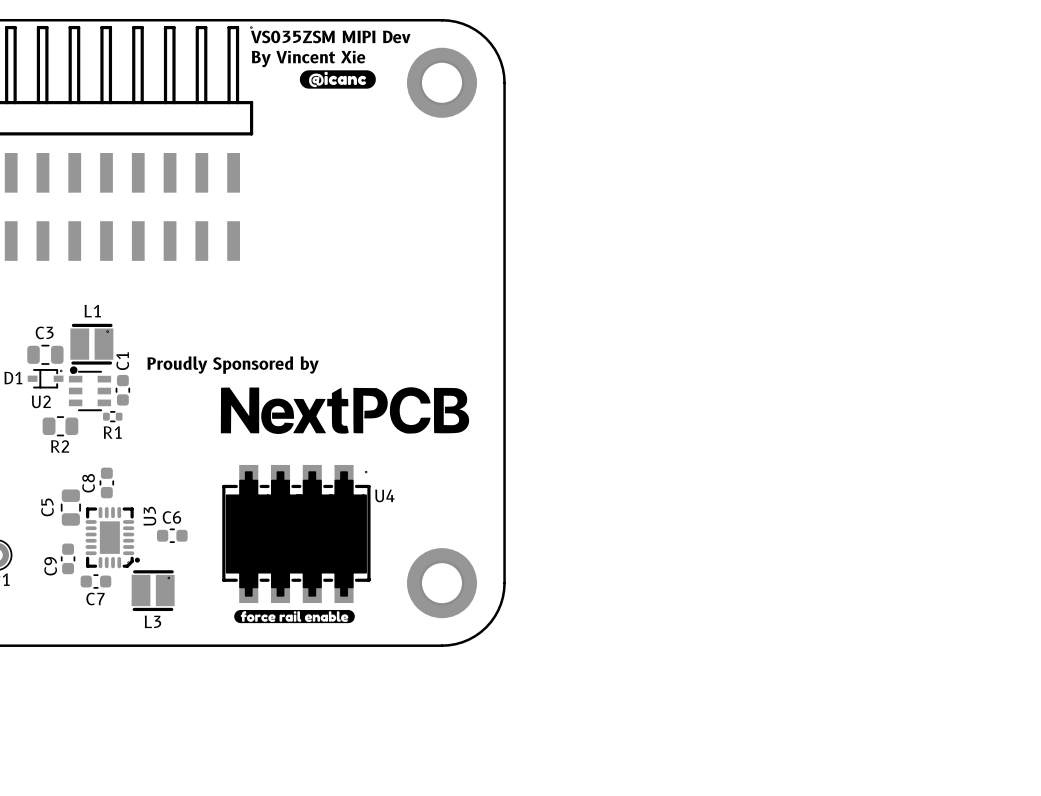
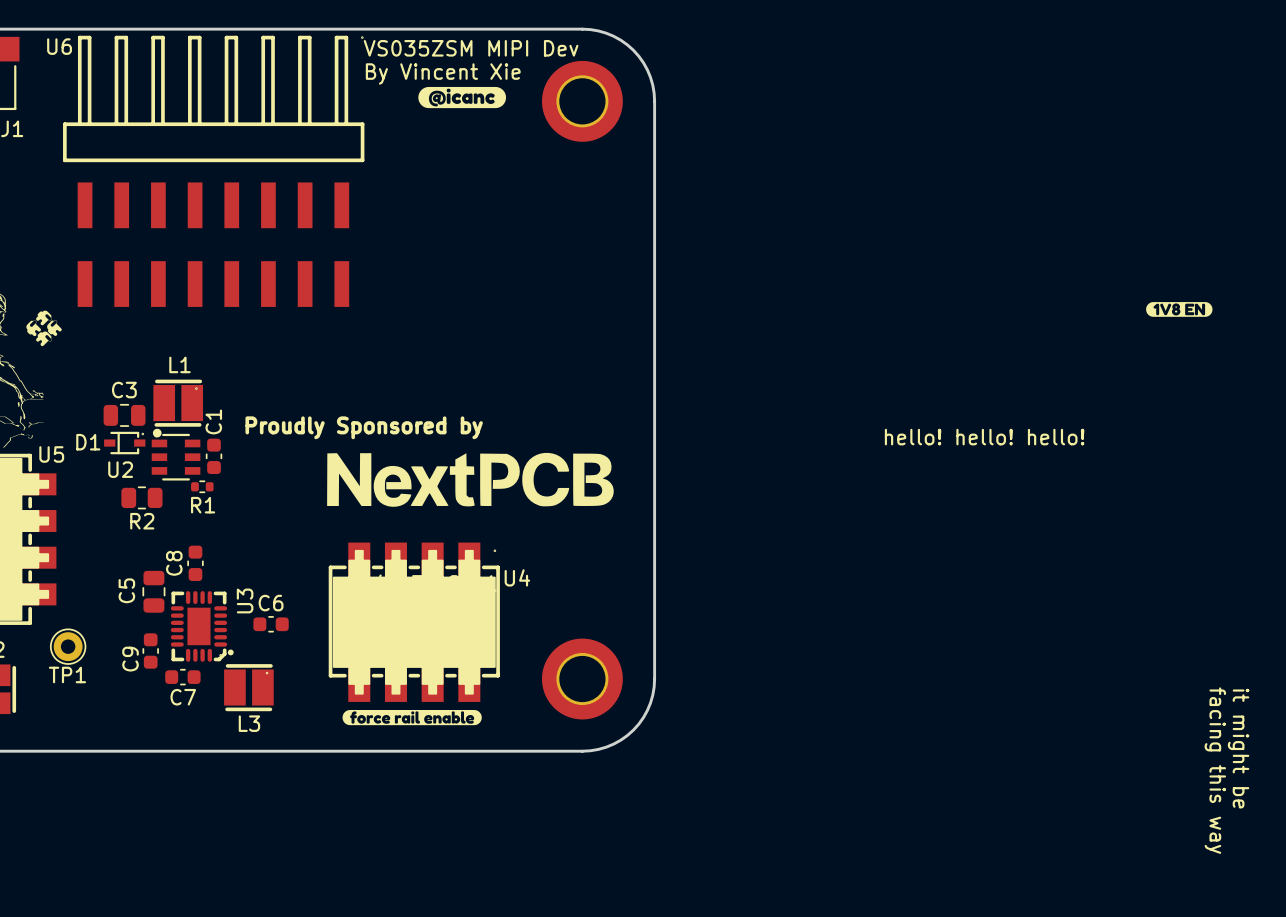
drawing: none -> [1146, 302, 1213, 317]
text: none -> hello! hello! hello! (984, 437)
text: none -> it might be (1238, 748)
text: none -> facing this way (1215, 770)

